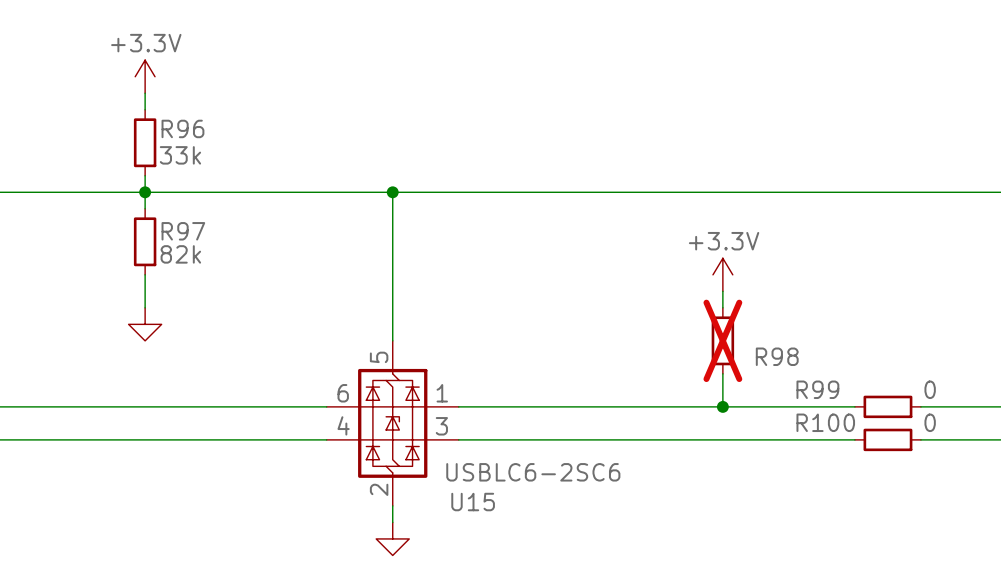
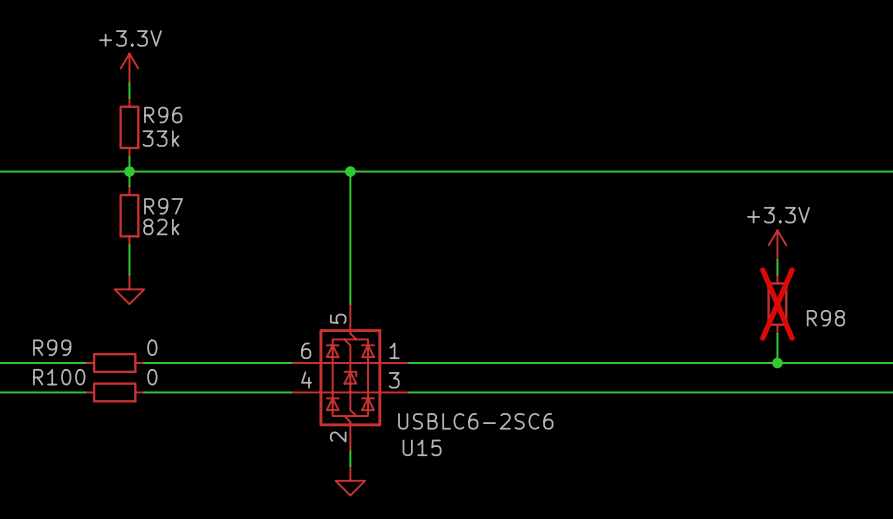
power symbol position: +3.3V (722, 274) -> +3.3V (777, 245)
wire: (722, 291) (722, 307) -> (777, 259) (777, 274)
R98 position: (722, 340) -> (777, 304)
wire: (722, 373) (722, 406) -> (777, 333) (777, 363)
wire: (95, 406) (161, 406) -> none
junction: (722, 406) -> none
wire: none -> (762, 363) (821, 363)
junction: none -> (777, 363)
R99 position: (887, 406) -> (114, 363)
wire: (95, 439) (161, 439) -> none
wire: none -> (762, 392) (821, 392)
R100 position: (887, 439) -> (114, 392)

